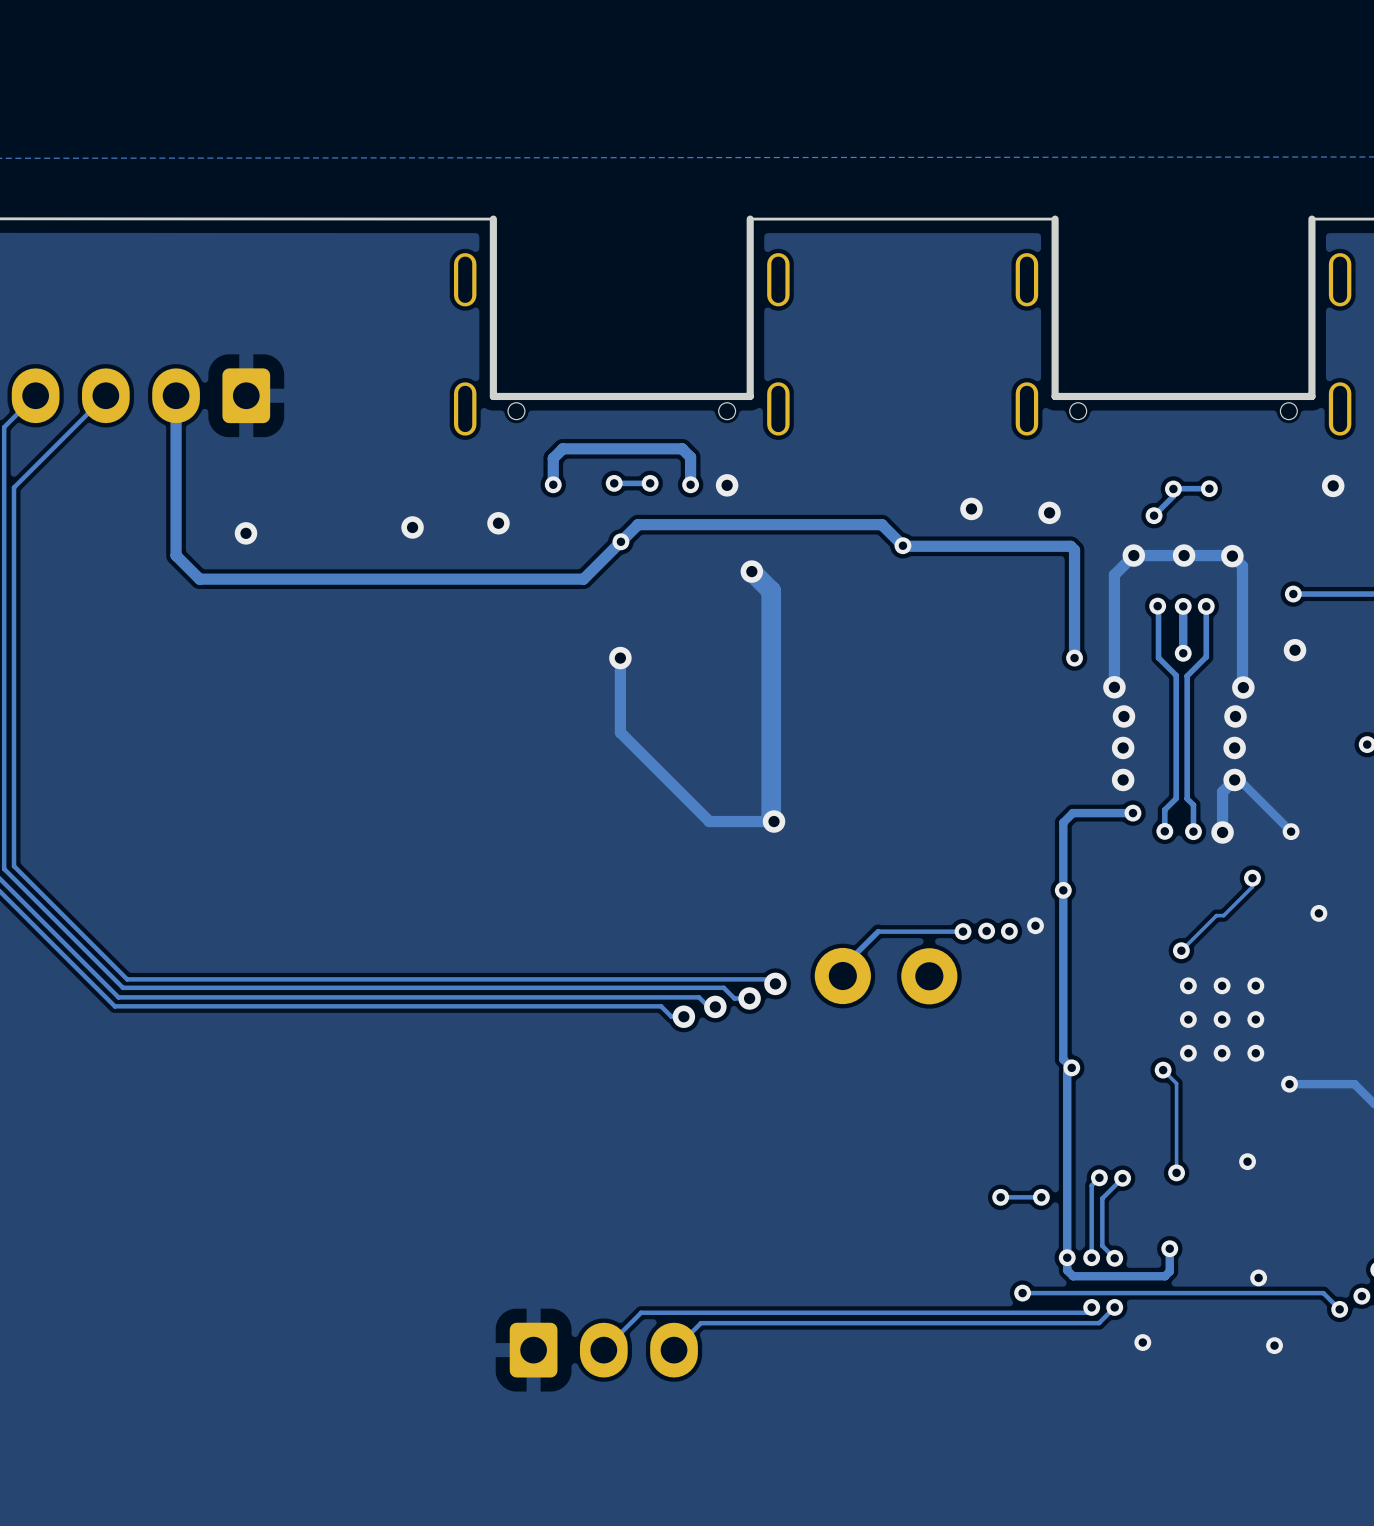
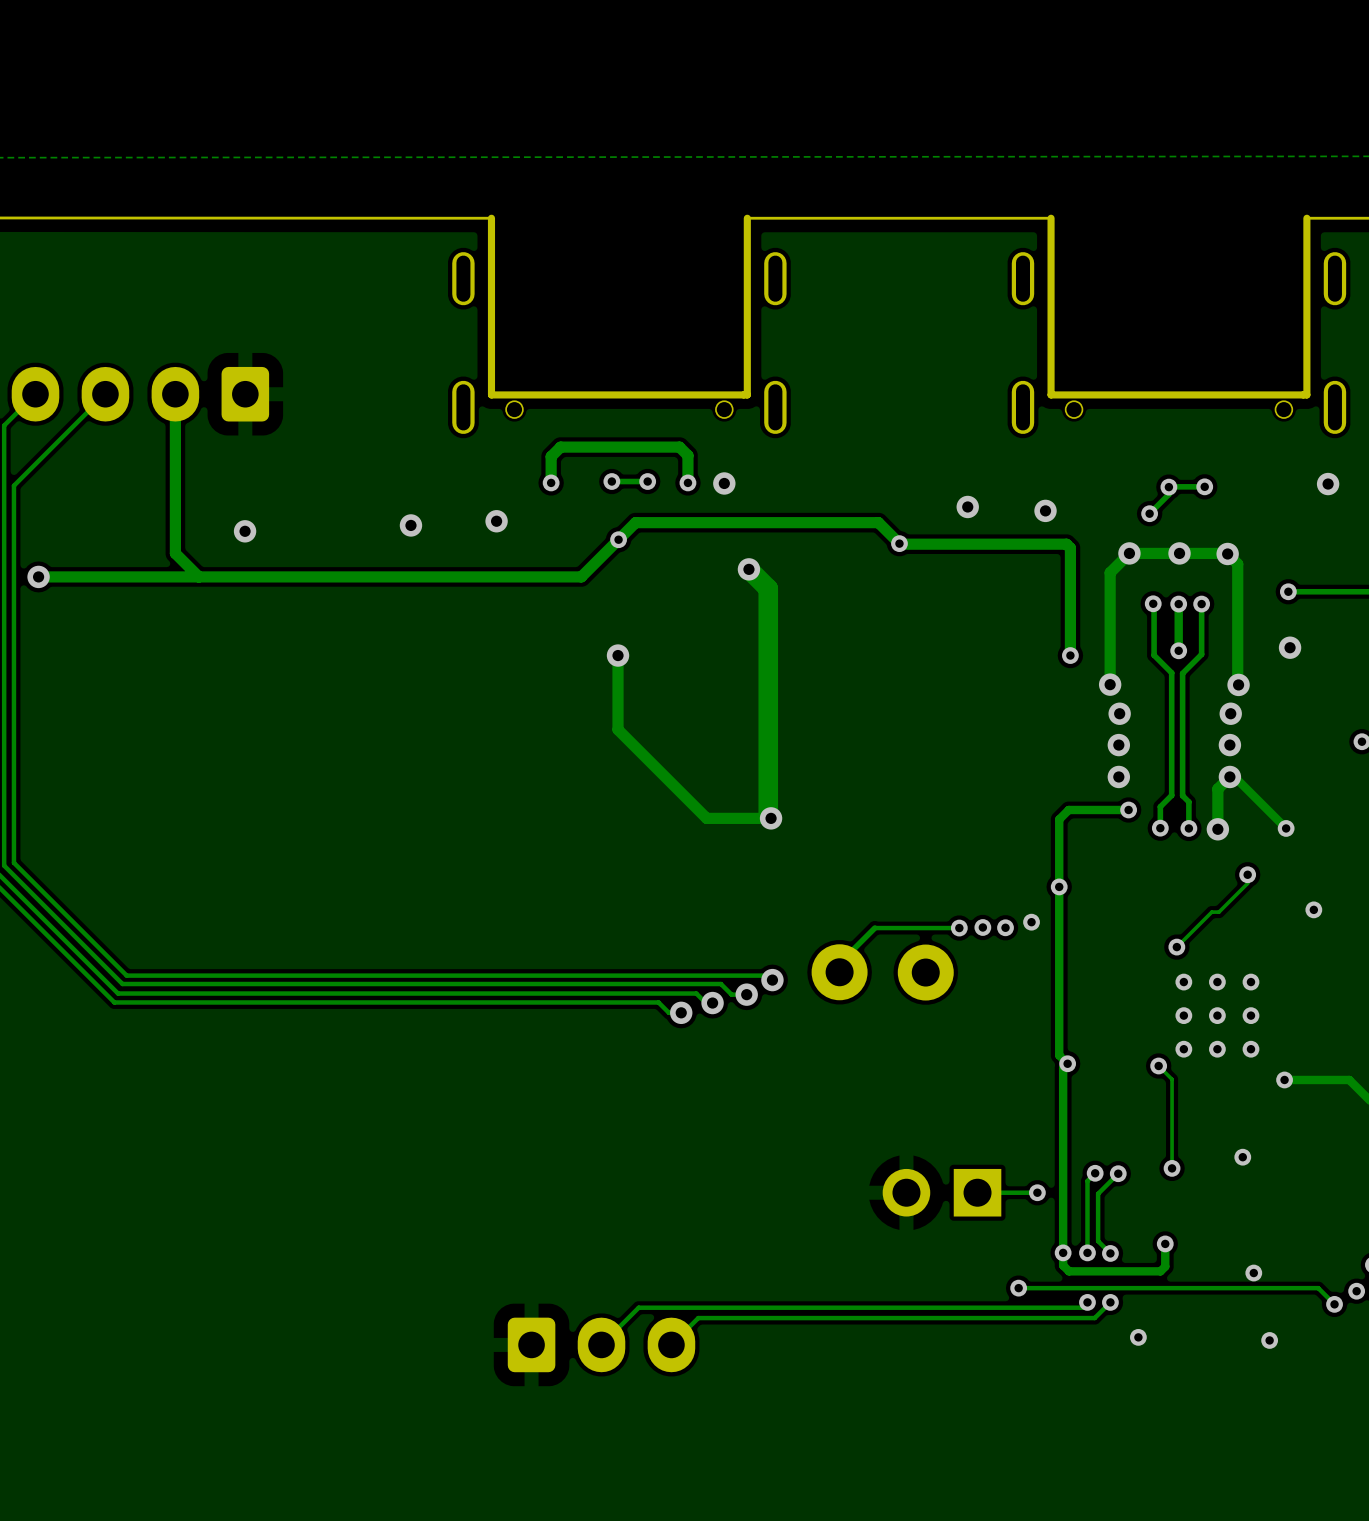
via: none -> (38, 576)
track: none -> (198, 576) (38, 576)
part: none -> (942, 1192)
via: (1000, 1197) -> none

